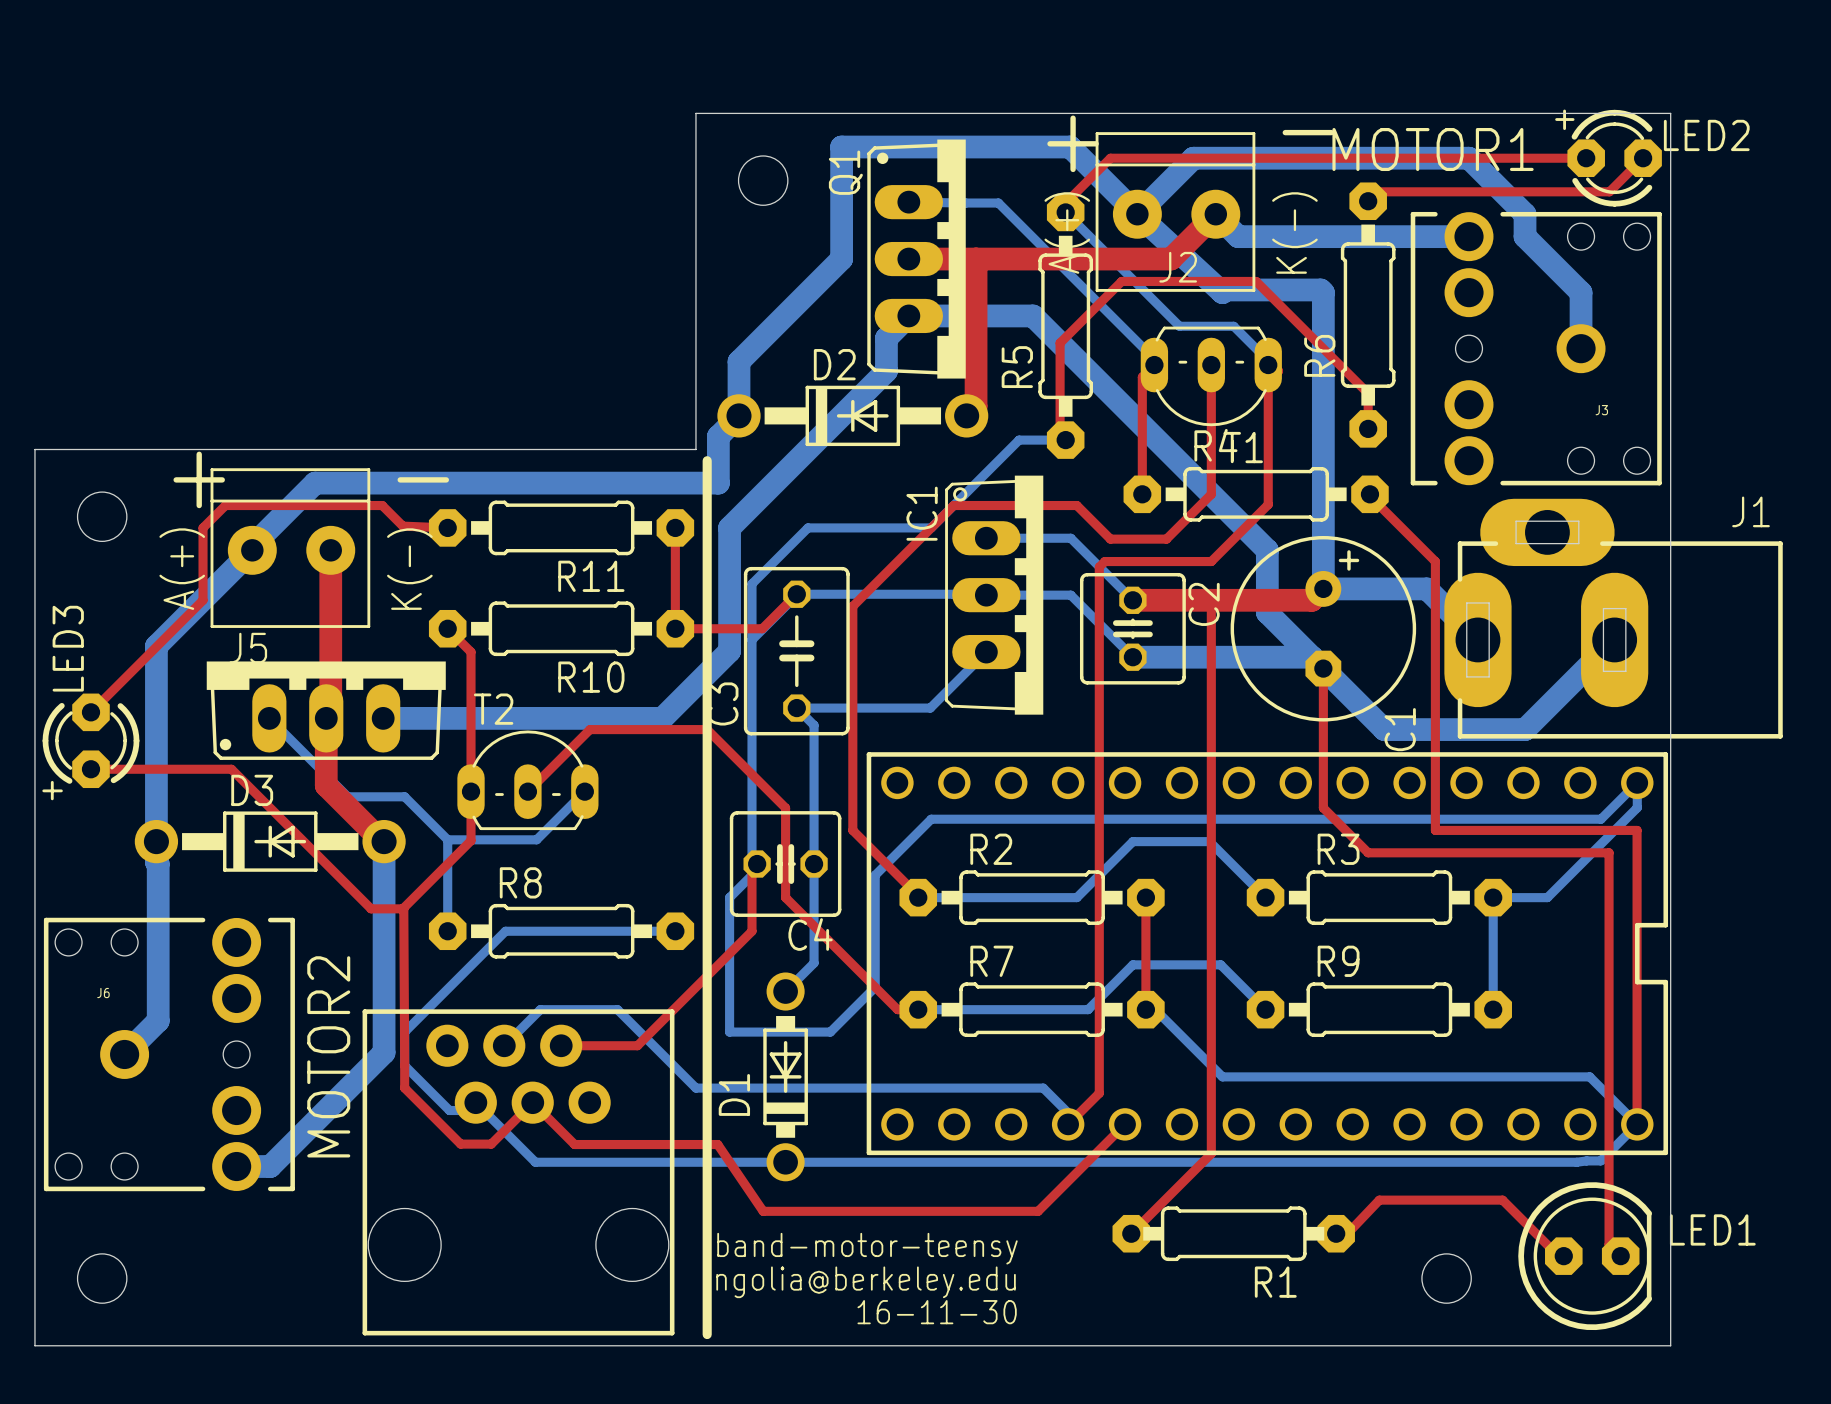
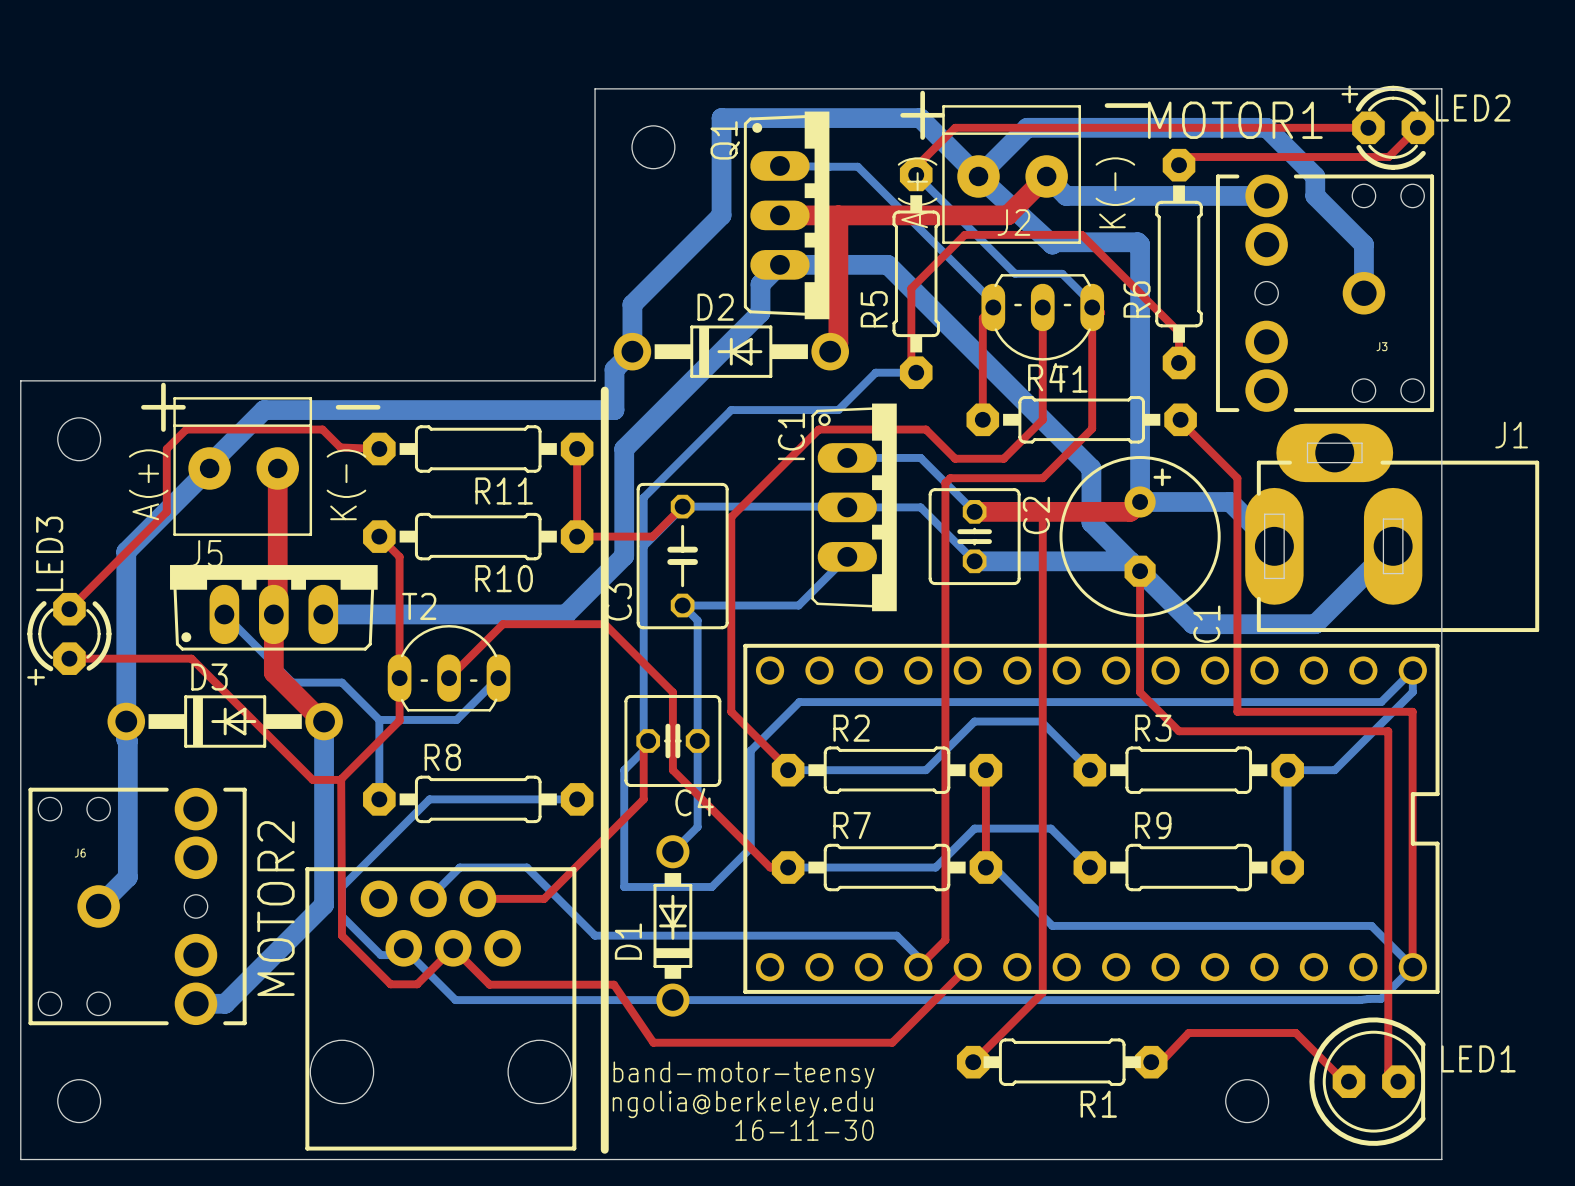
bottom track: (976, 483) (931, 527) (808, 527) -> (838, 410) (731, 410) (692, 449)

